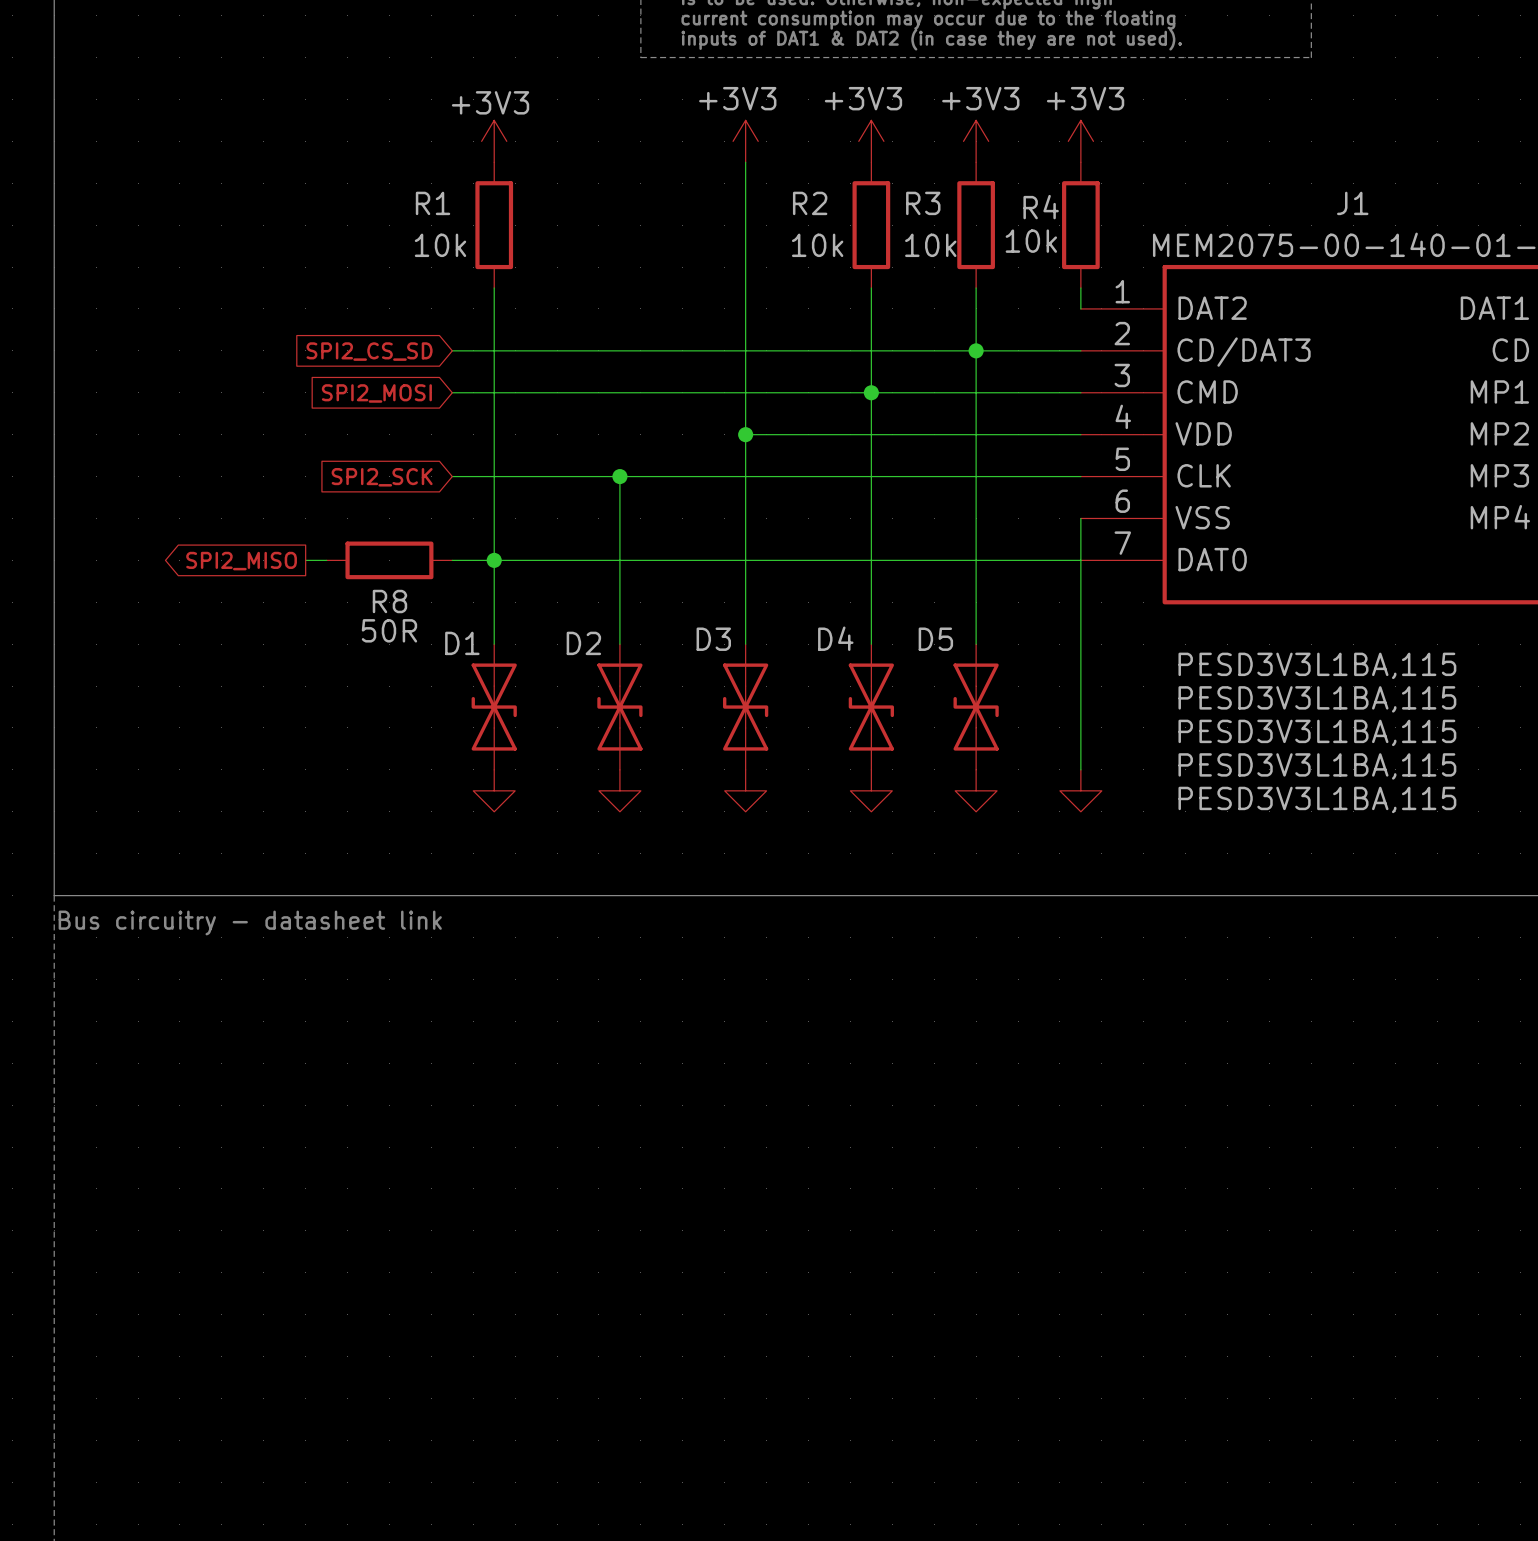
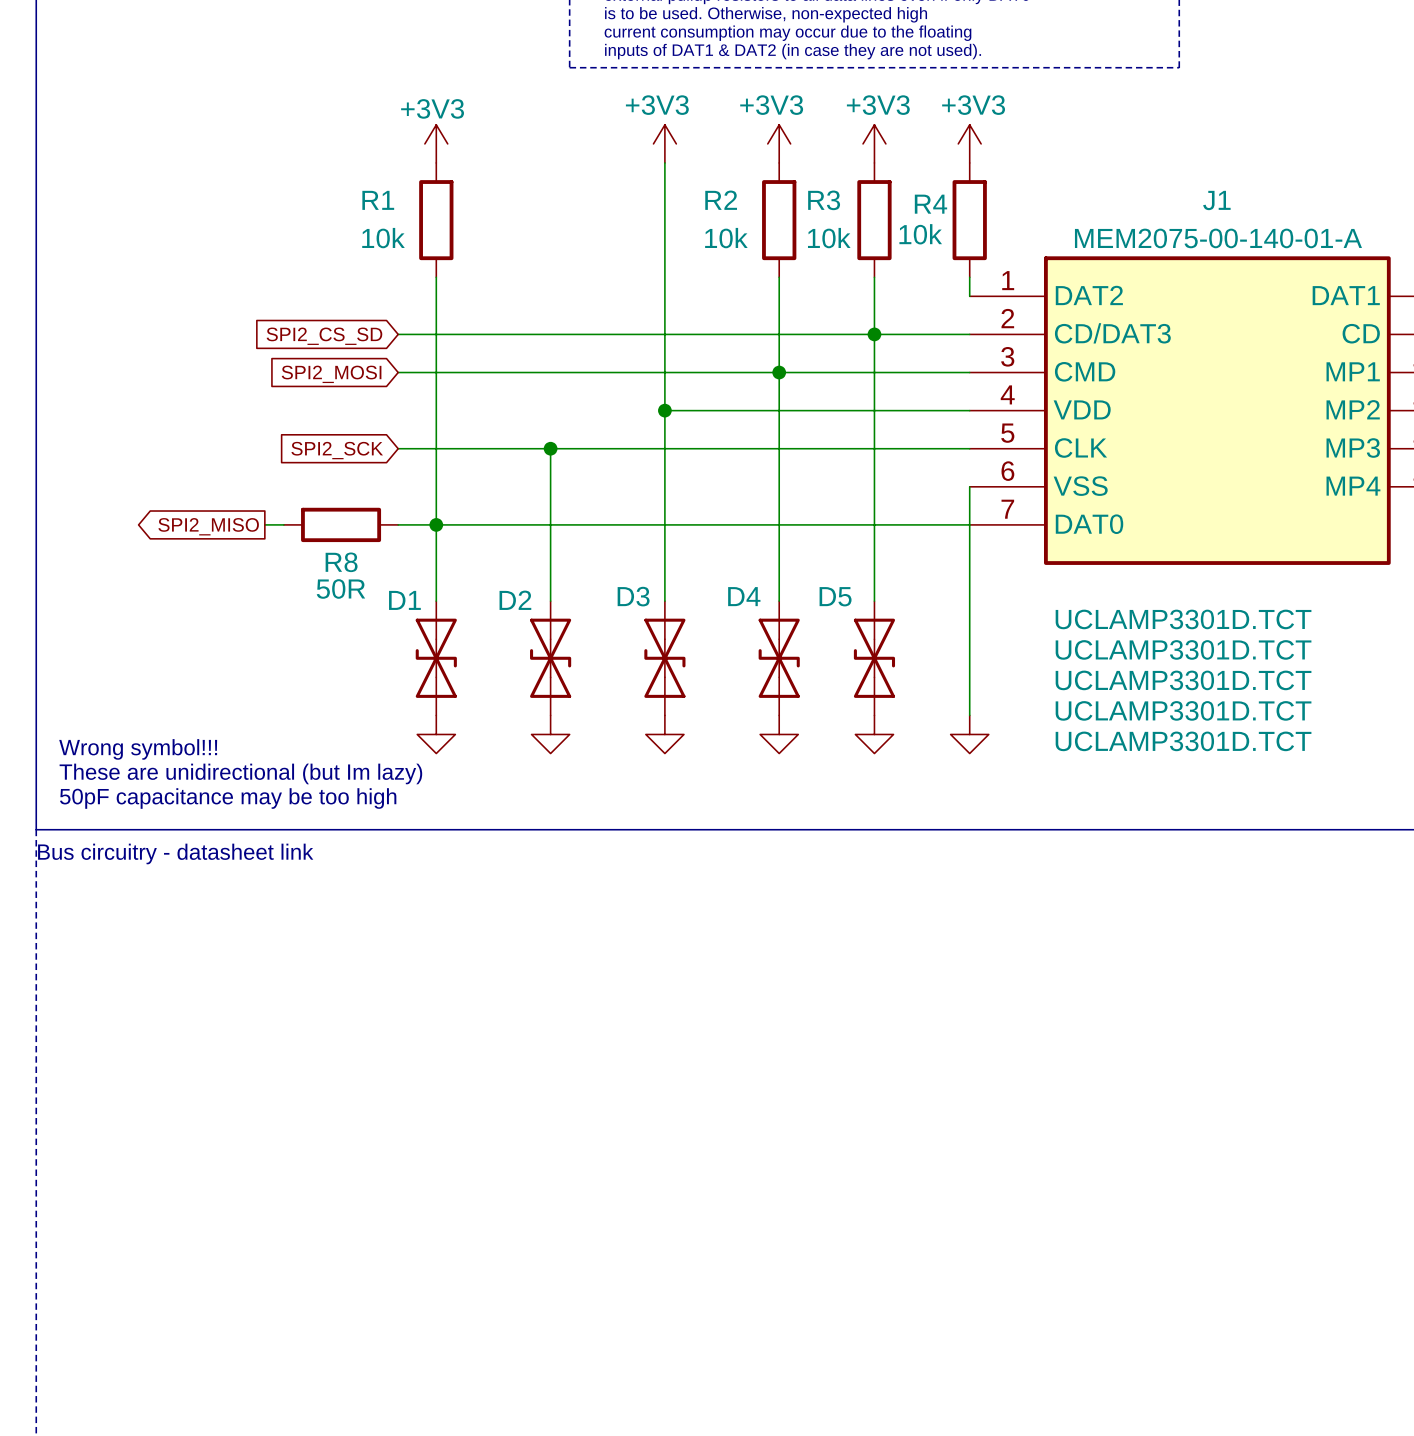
D4 value: PESD3V3L1BA,115 (1317, 665) -> UCLAMP3301D.TCT (1183, 619)
D2 value: PESD3V3L1BA,115 (1317, 699) -> UCLAMP3301D.TCT (1183, 649)
D3 value: PESD3V3L1BA,115 (1317, 732) -> UCLAMP3301D.TCT (1183, 680)
D5 value: PESD3V3L1BA,115 (1317, 766) -> UCLAMP3301D.TCT (1183, 710)
D1 value: PESD3V3L1BA,115 (1317, 799) -> UCLAMP3301D.TCT (1183, 741)
text: none -> Wrong symbol!!! (138, 749)
text: none -> These are unidirectional (but Im lazy) (240, 773)
text: none -> 50pF capacitance may be too high (228, 798)

